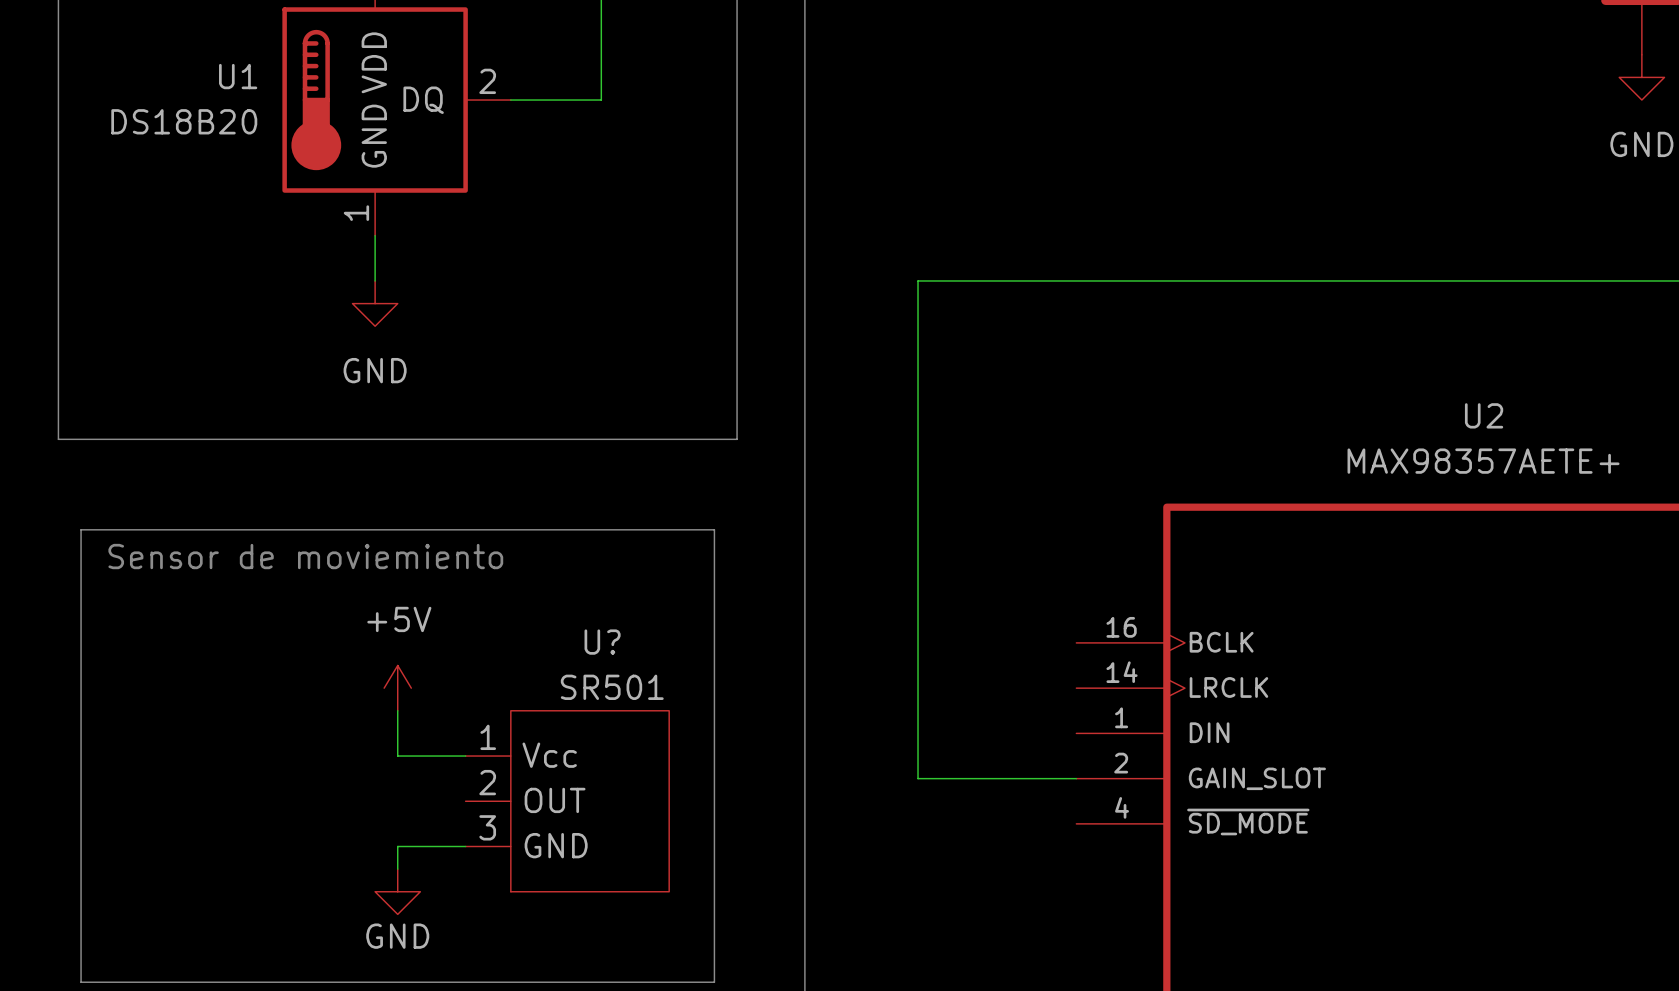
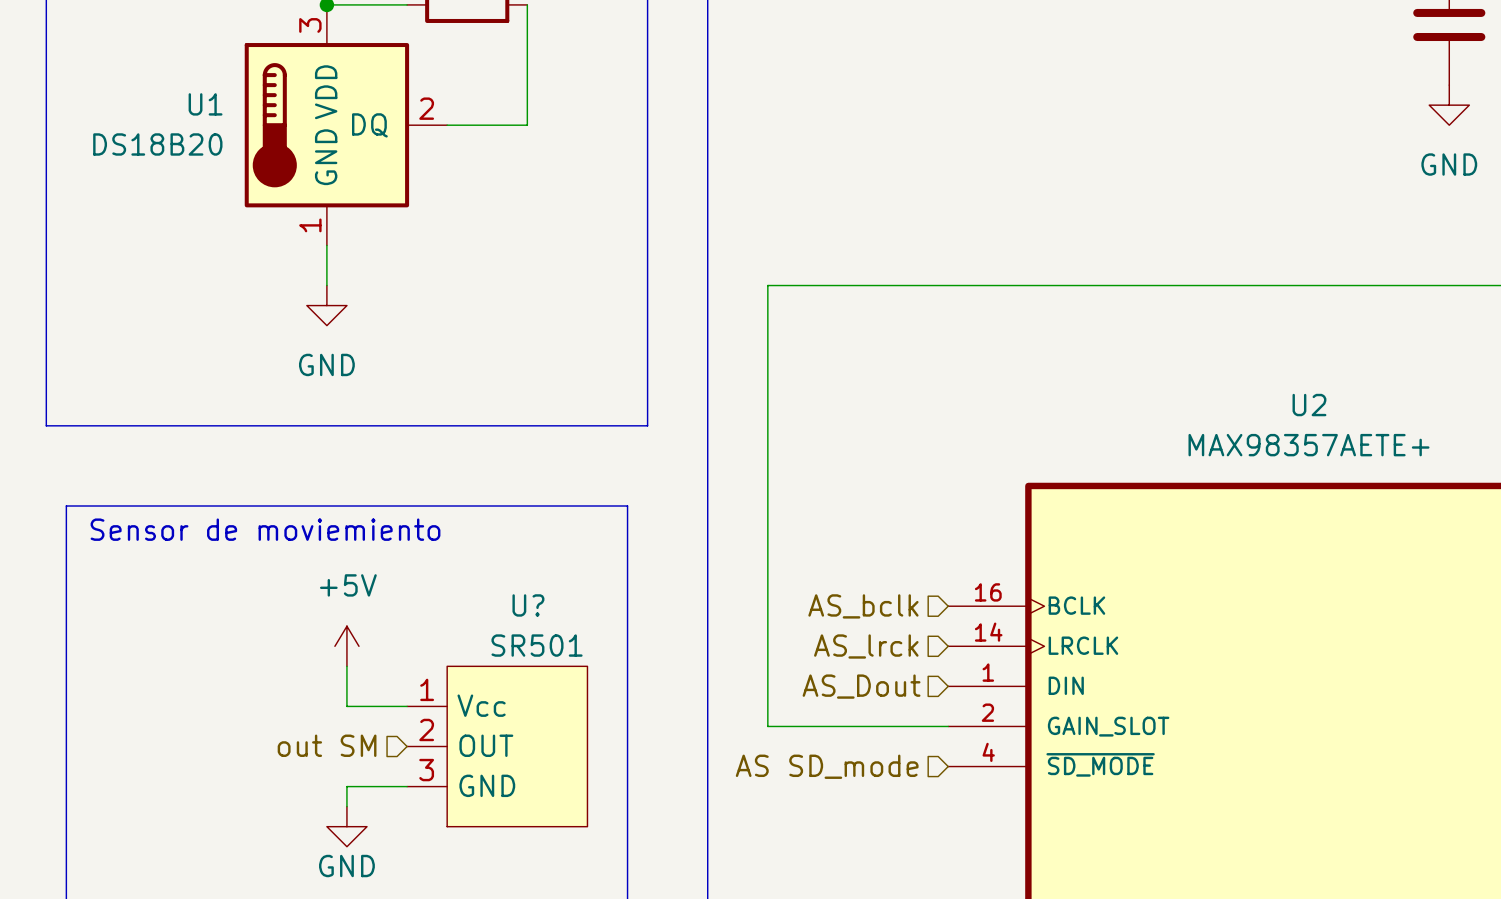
wire: (918, 280) (918, 778) -> (807, 285) (767, 285) (767, 726) (807, 726)
hierarchical label: none -> AS_bclk (863, 606)
hierarchical label: none -> AS_lrck (866, 646)
hierarchical label: none -> AS_Dout (861, 686)
hierarchical label: none -> out SM (327, 745)
hierarchical label: none -> AS SD_mode (827, 766)

